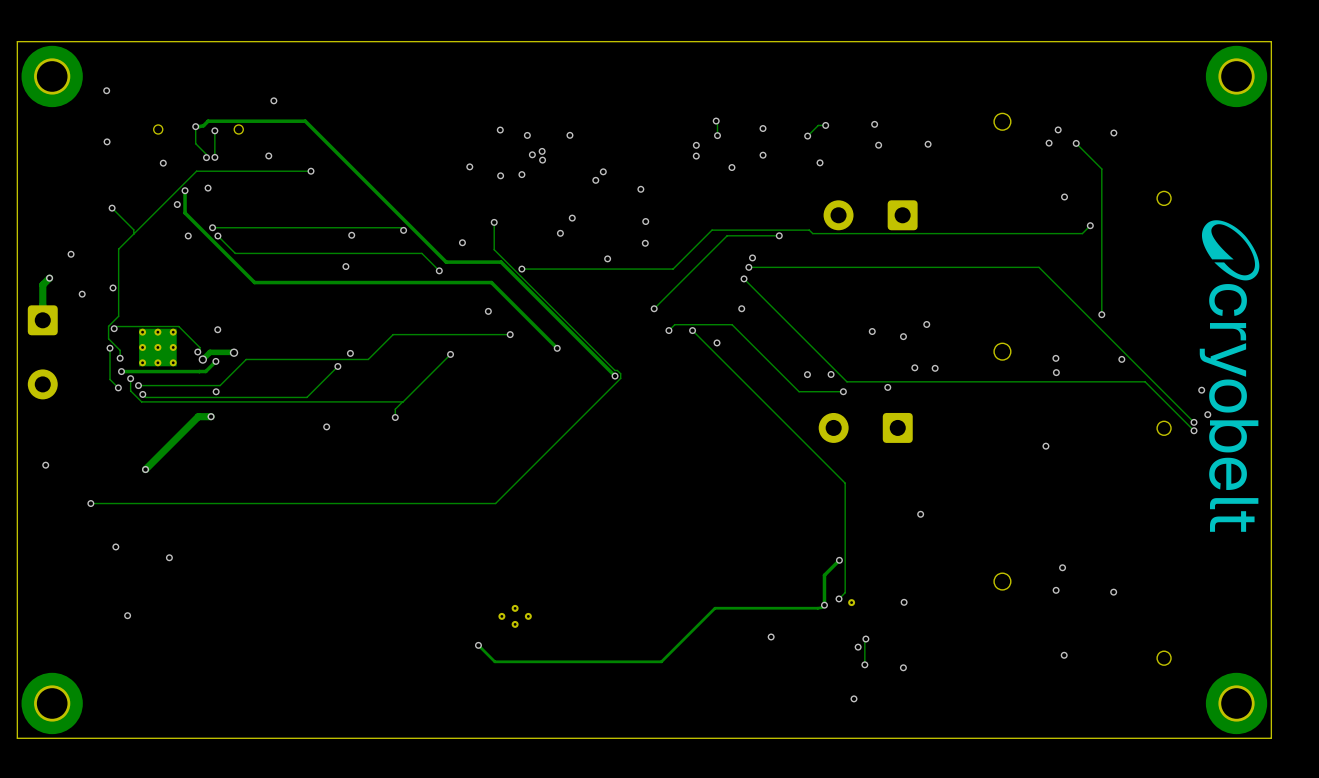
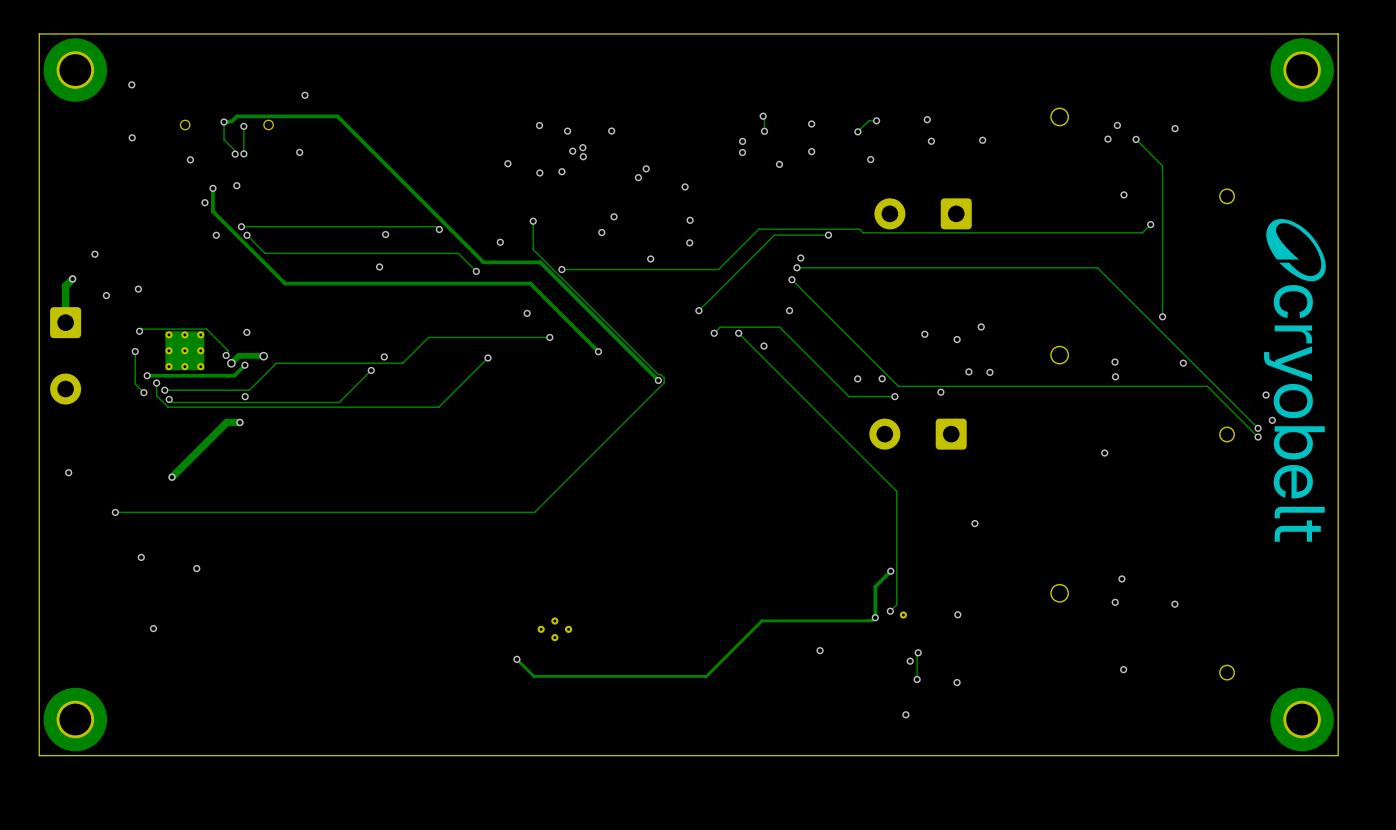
track: (310, 171) (196, 171) (118, 249) (118, 316) (108, 326) (108, 338) (120, 350) (120, 358) -> none
via: (310, 171) -> none
track: (112, 208) (133, 229) (133, 234) -> none
via: (112, 208) -> none
via: (120, 358) -> none
track: (402, 401) (395, 409) (395, 417) -> none
via: (395, 417) -> none
via: (326, 426) -> none

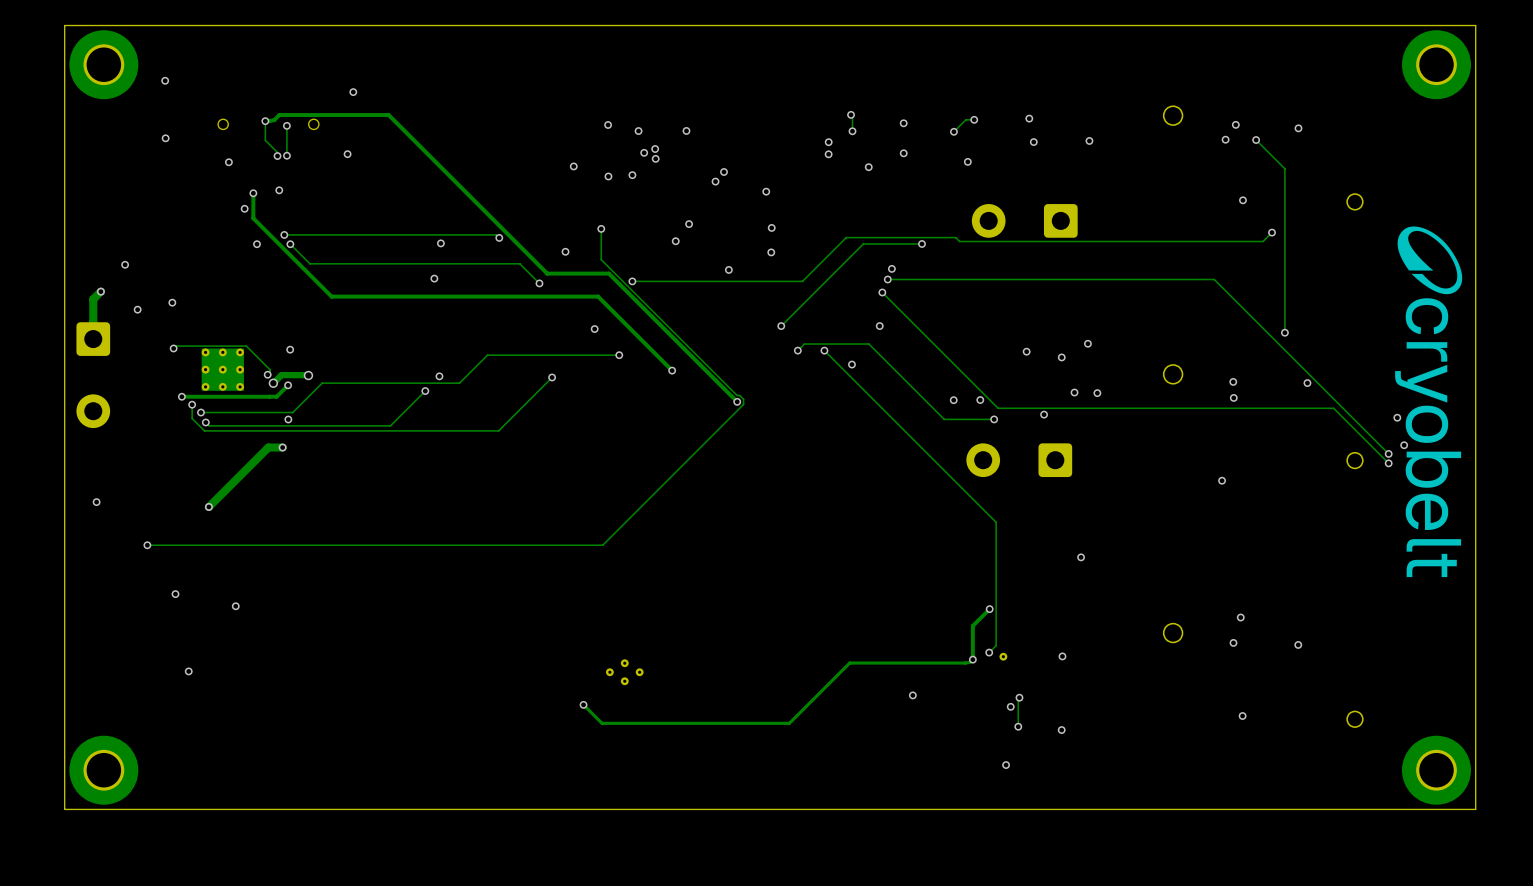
track: (135, 351) (135, 383) (143, 392) -> none
via: (135, 351) -> none
via: (143, 392) -> none

